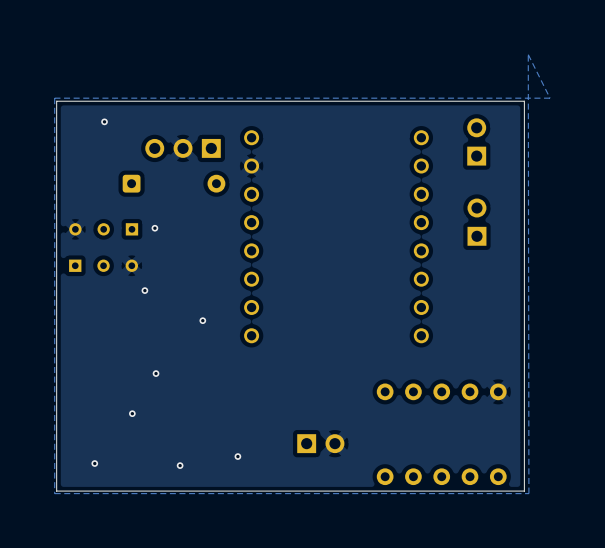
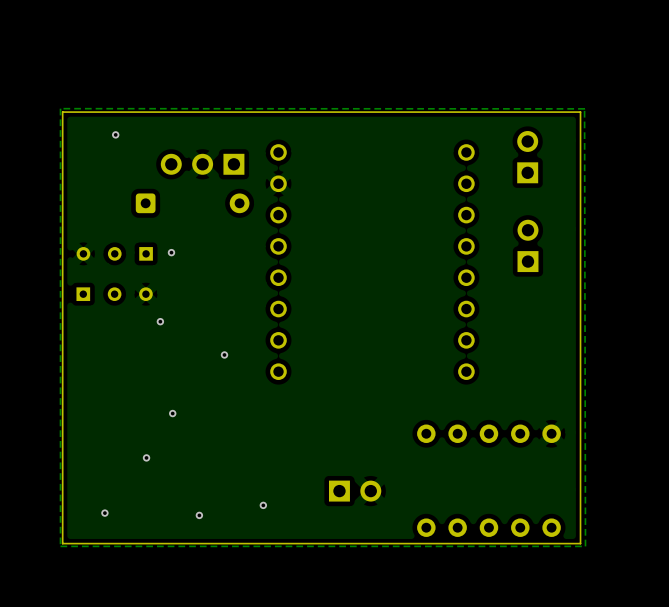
zone outline: (54, 98) (550, 98) (528, 54) (528, 493) -> (60, 108) (584, 108) (585, 546)

